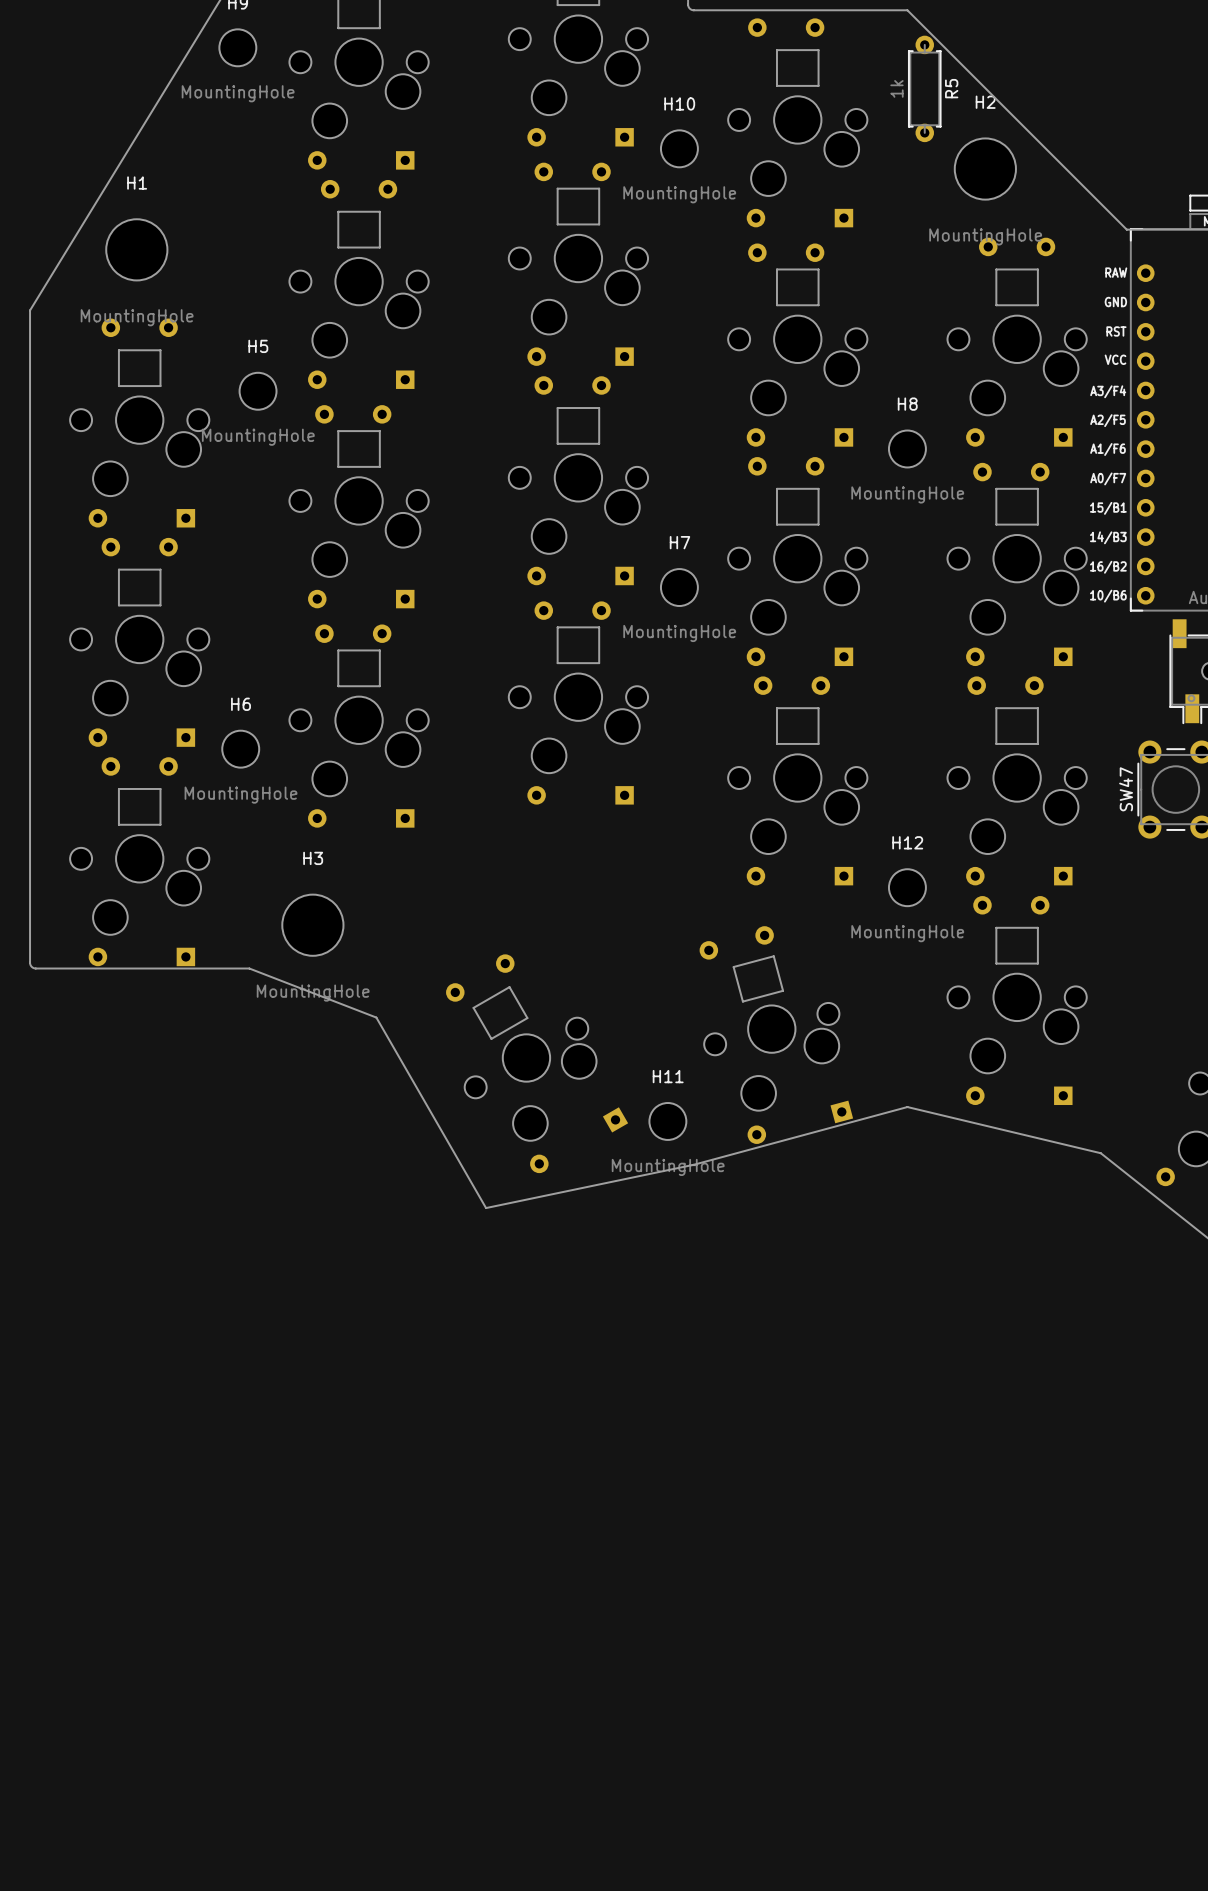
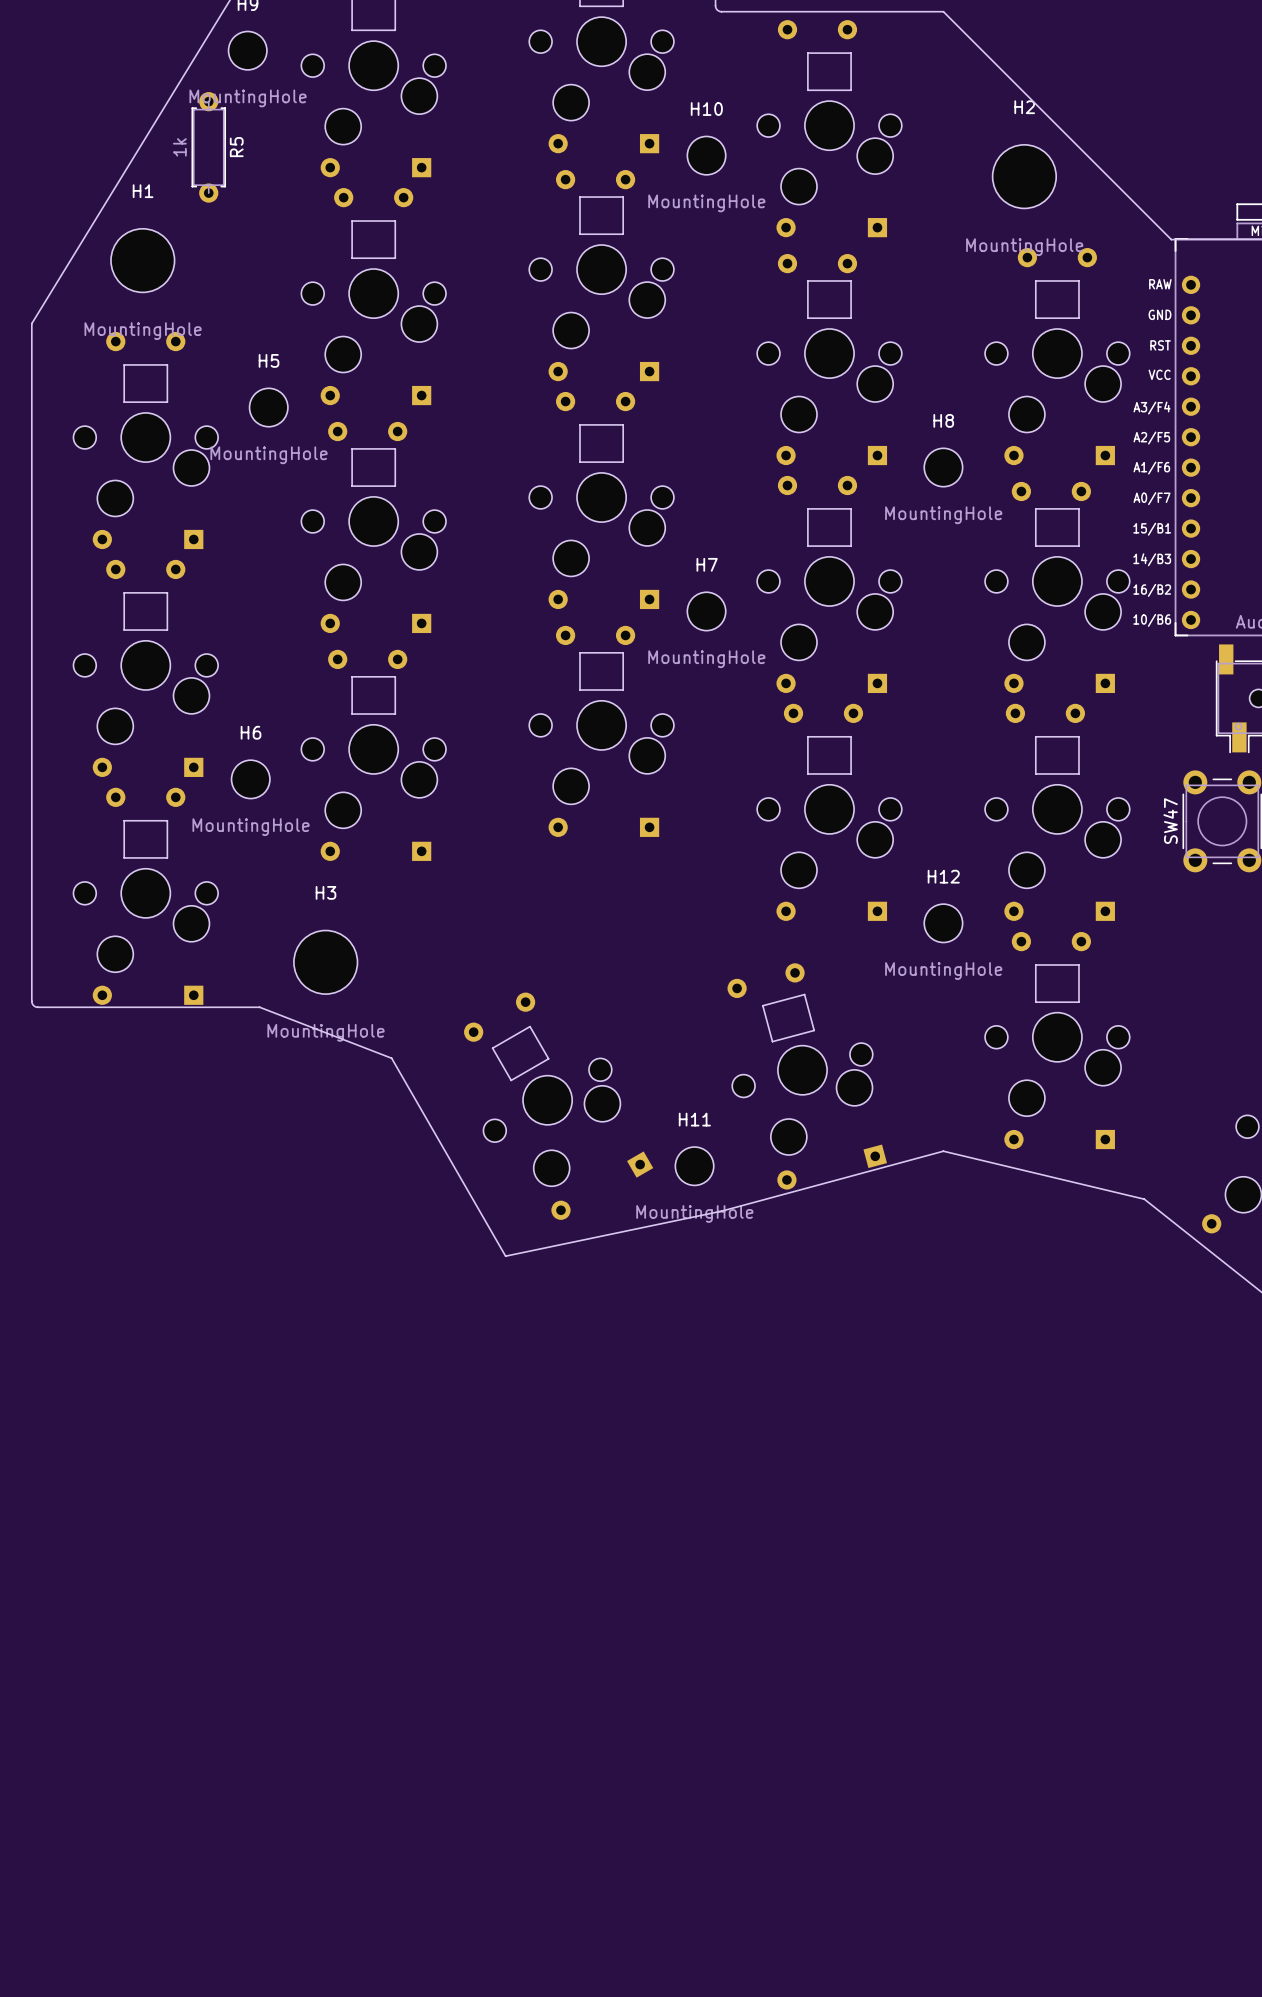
R5 position: (924, 88) -> (208, 147)

